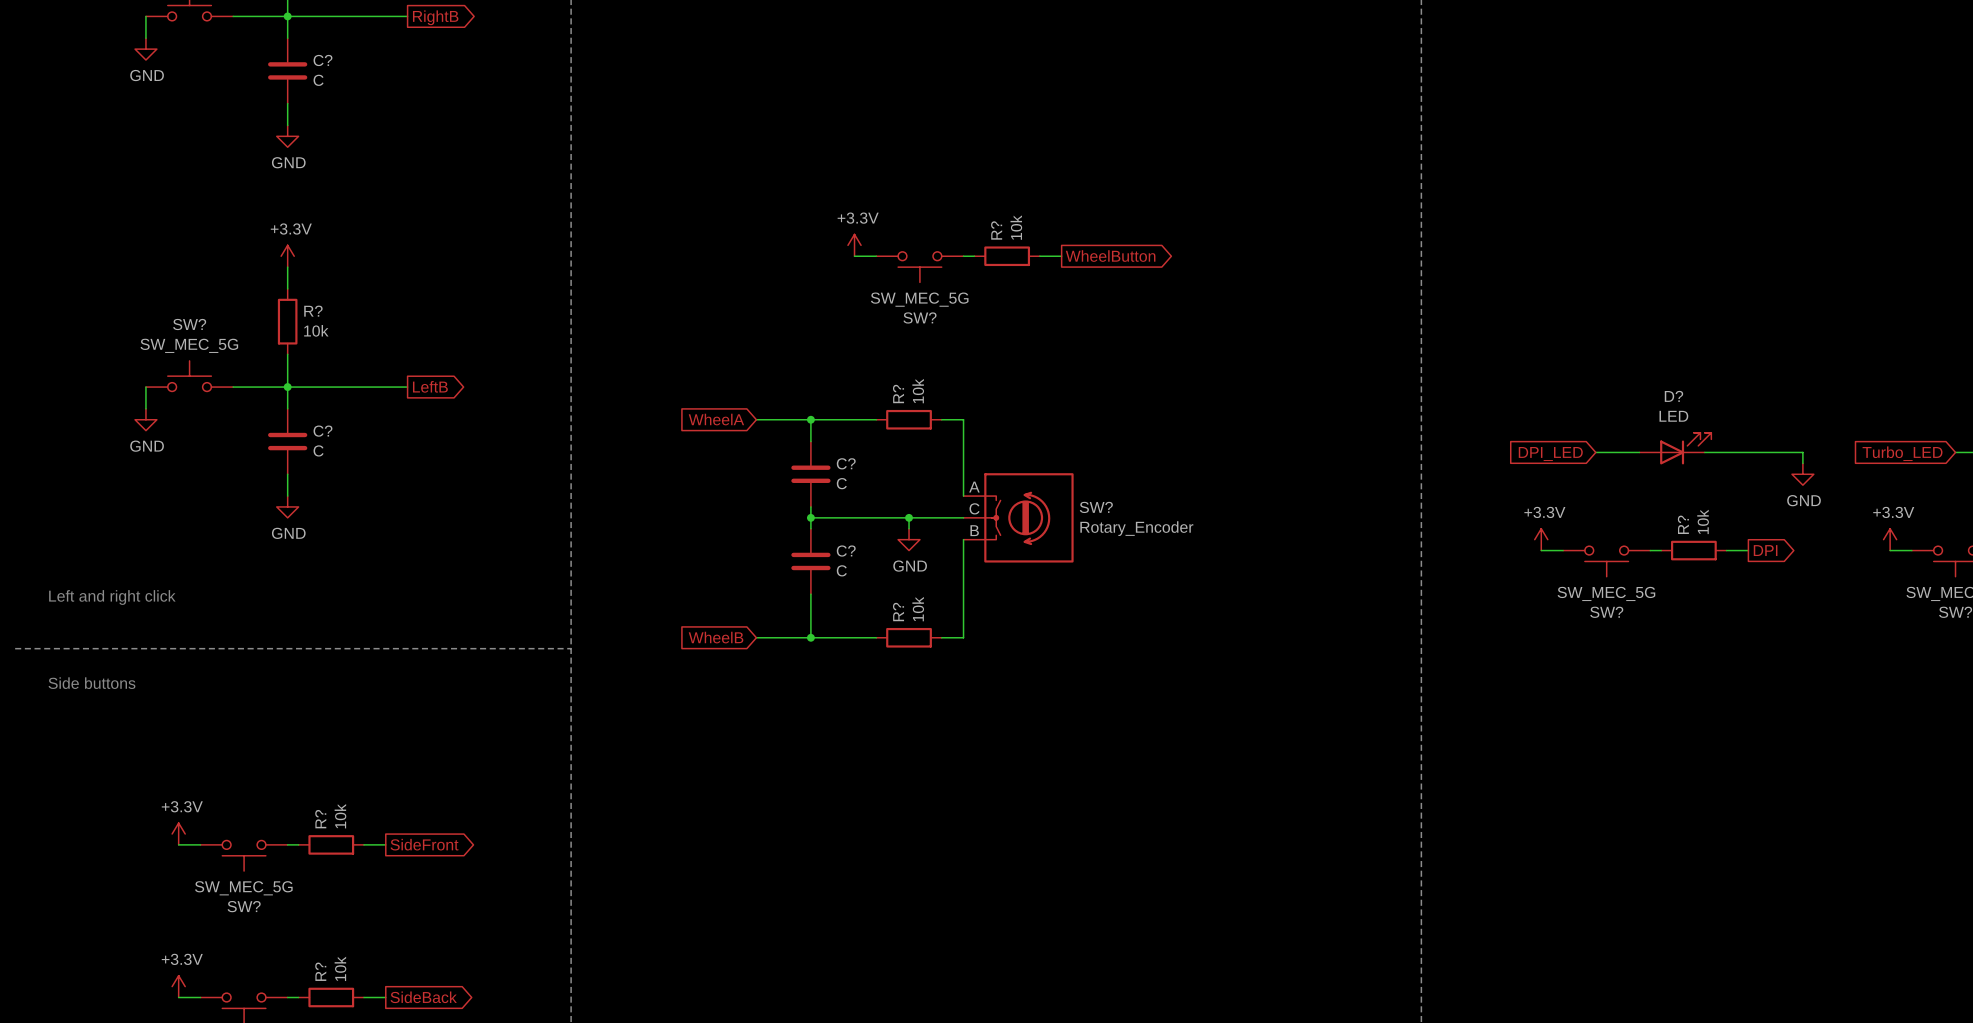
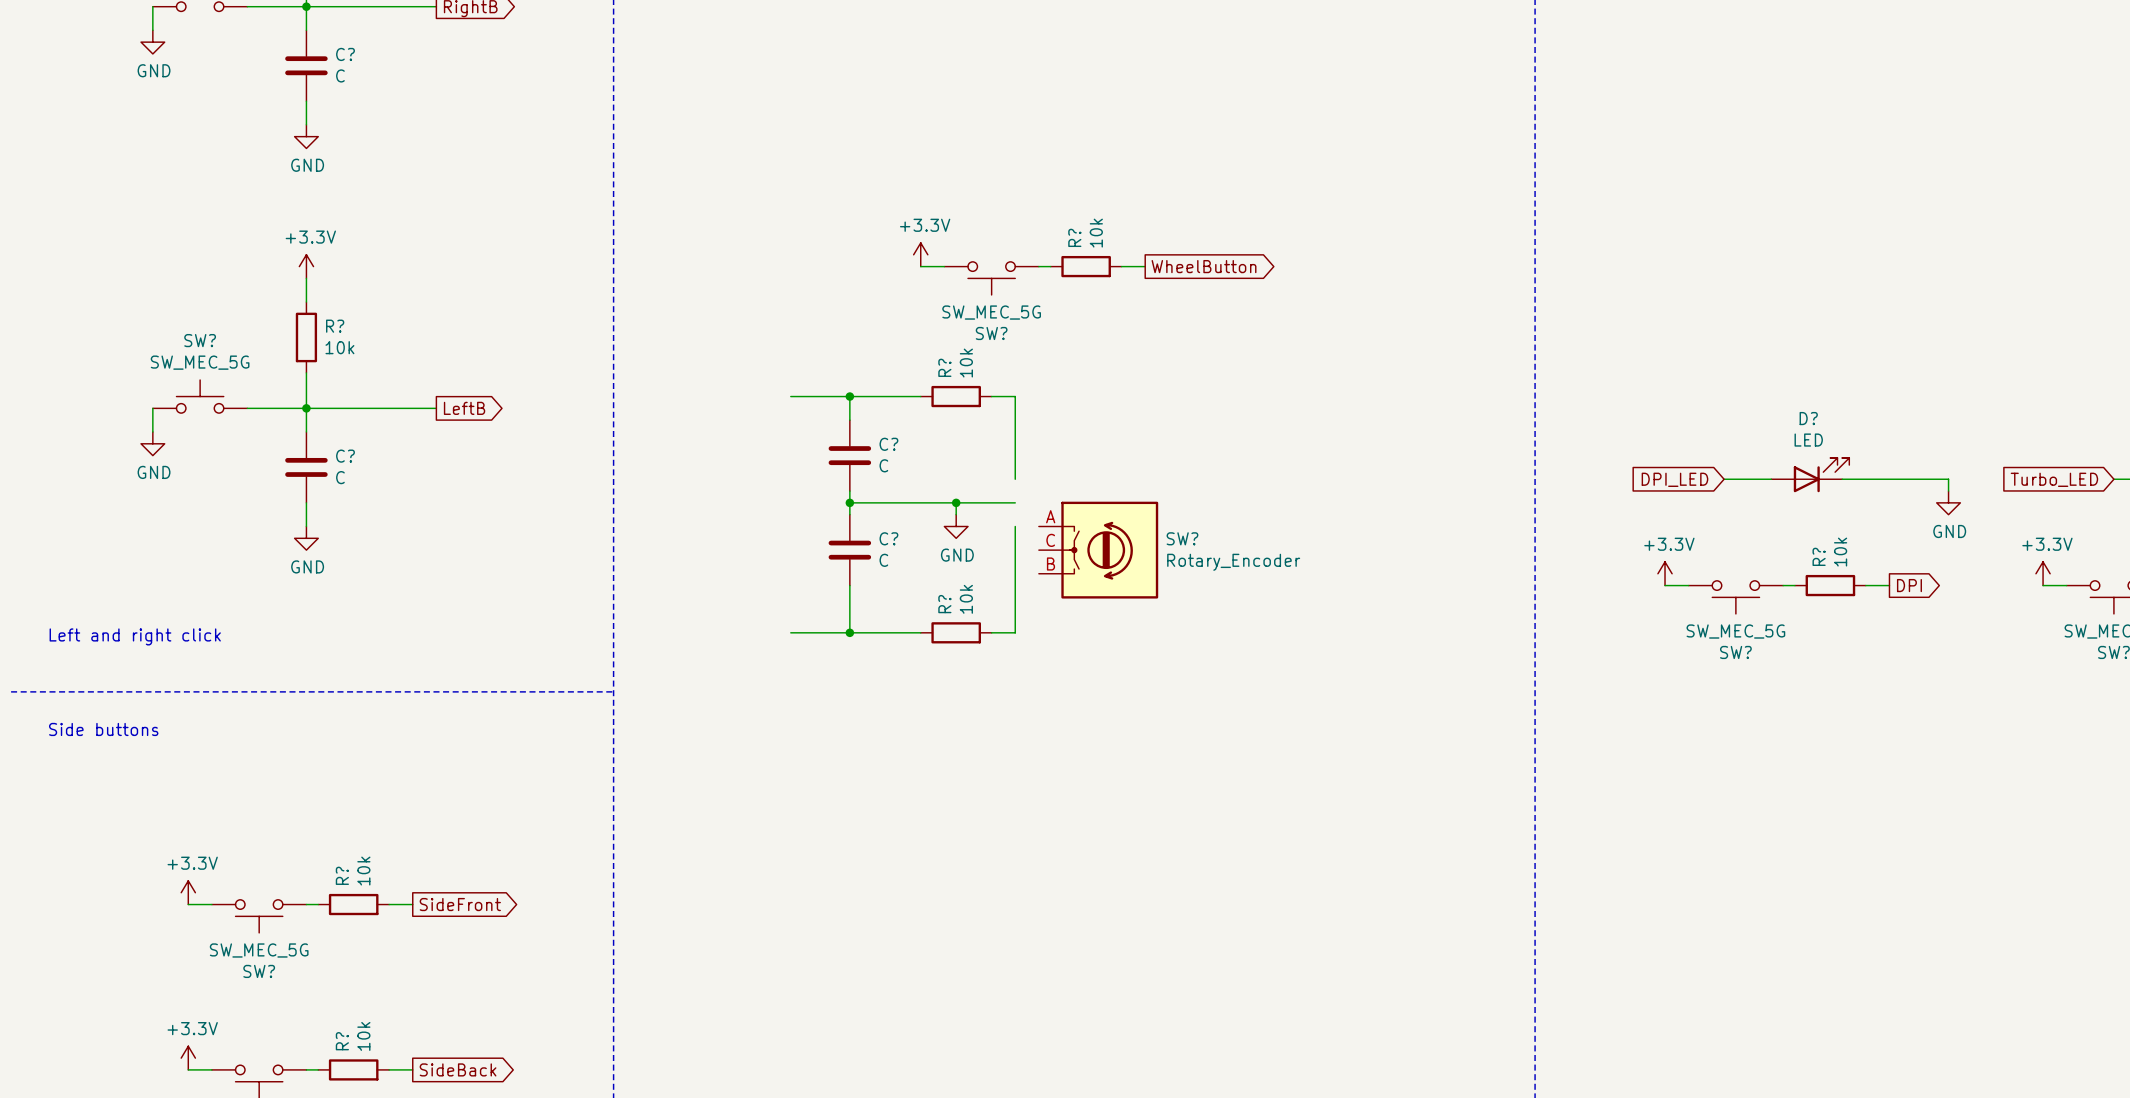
junction: none -> (849, 396)
global label: WheelA (716, 419) -> none
wire: (756, 419) (876, 419) -> (790, 396) (920, 396)
wire: (810, 419) (810, 441) -> (849, 396) (849, 420)
junction: (810, 419) -> none
R? position: (909, 419) -> (956, 396)
wire: (941, 419) (963, 419) (963, 496) -> (991, 396) (1015, 396) (1015, 479)
C?: none -> C (849, 455)
junction: none -> (849, 502)
C?: C (810, 474) -> none
junction: none -> (956, 502)
wire: (810, 506) (810, 528) -> (849, 491) (849, 514)
C?: none -> C (849, 550)
wire: (810, 517) (963, 517) -> (849, 502) (1015, 502)
junction: (810, 517) -> none
wire: (909, 517) (909, 528) -> (956, 502) (956, 514)
junction: (909, 517) -> none
power symbol position: GND (909, 539) -> GND (956, 526)
wire: (963, 539) (963, 637) (941, 637) -> (1015, 526) (1015, 632) (991, 632)
C?: C (810, 561) -> none
junction: none -> (849, 632)
wire: (810, 594) (810, 637) -> (849, 585) (849, 632)
global label: WheelB (716, 637) -> none
wire: (756, 637) (876, 637) -> (790, 632) (920, 632)
junction: (810, 637) -> none
R? position: (909, 637) -> (956, 632)

